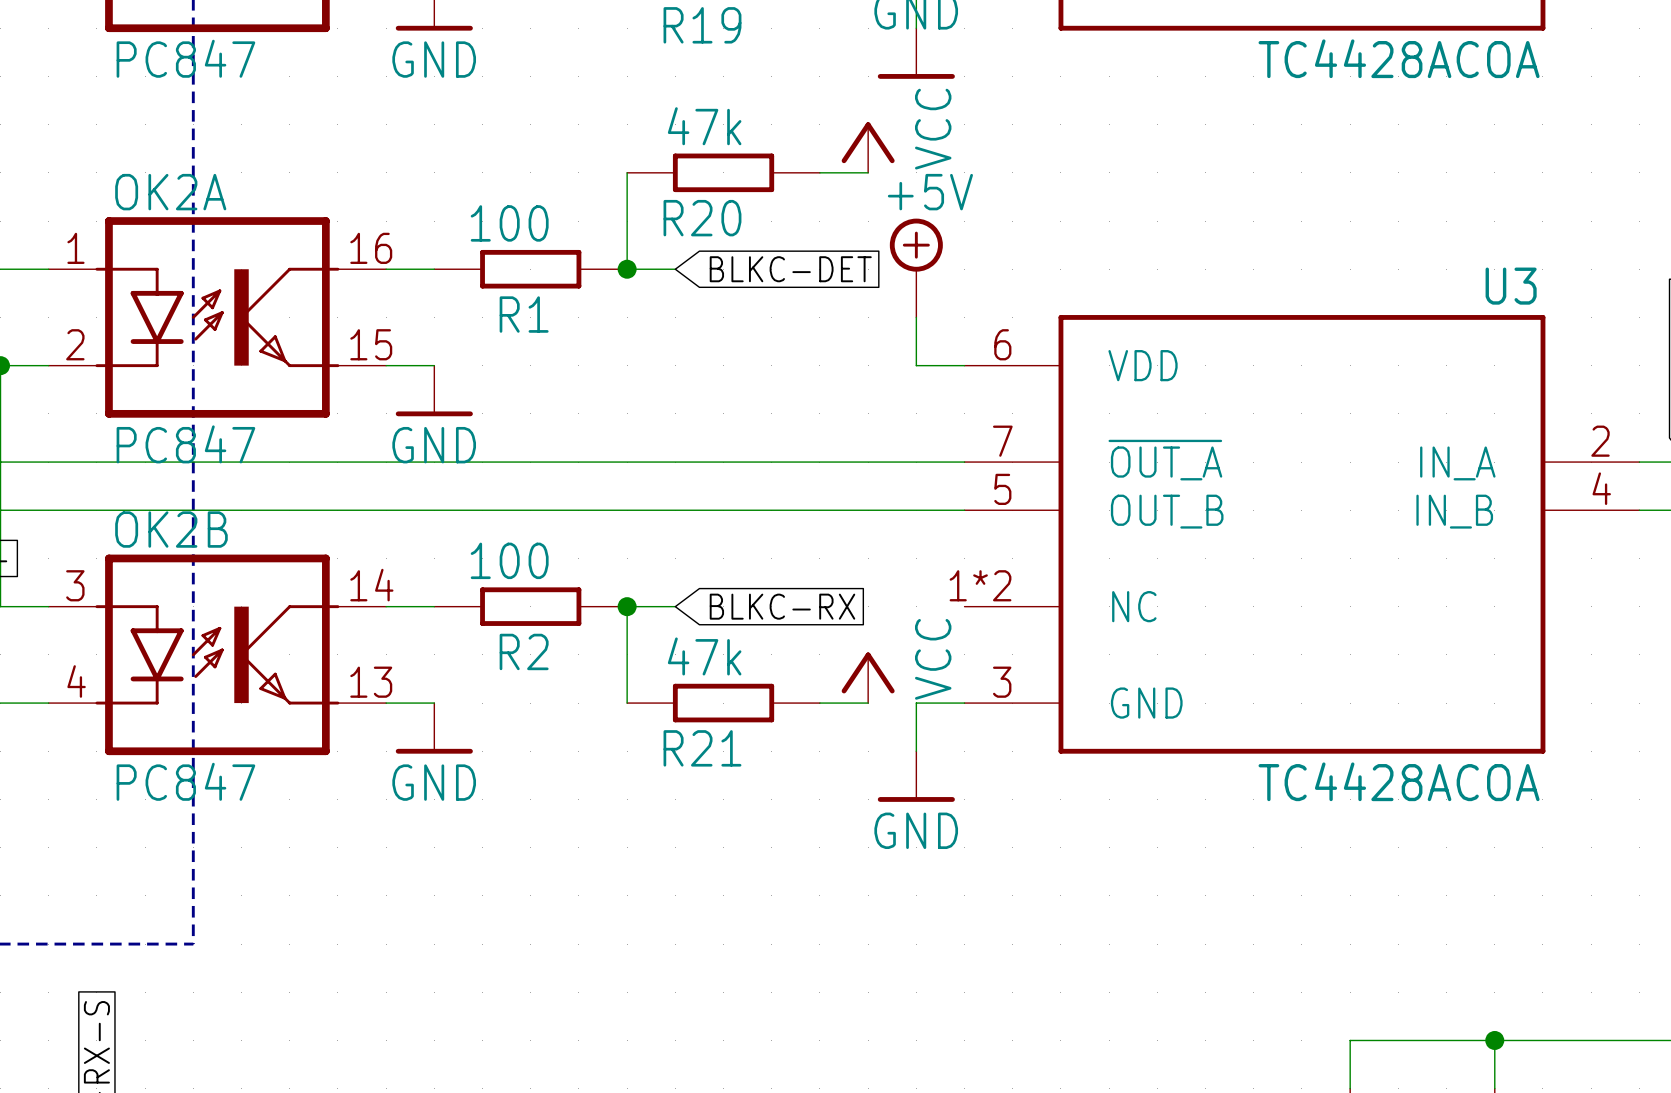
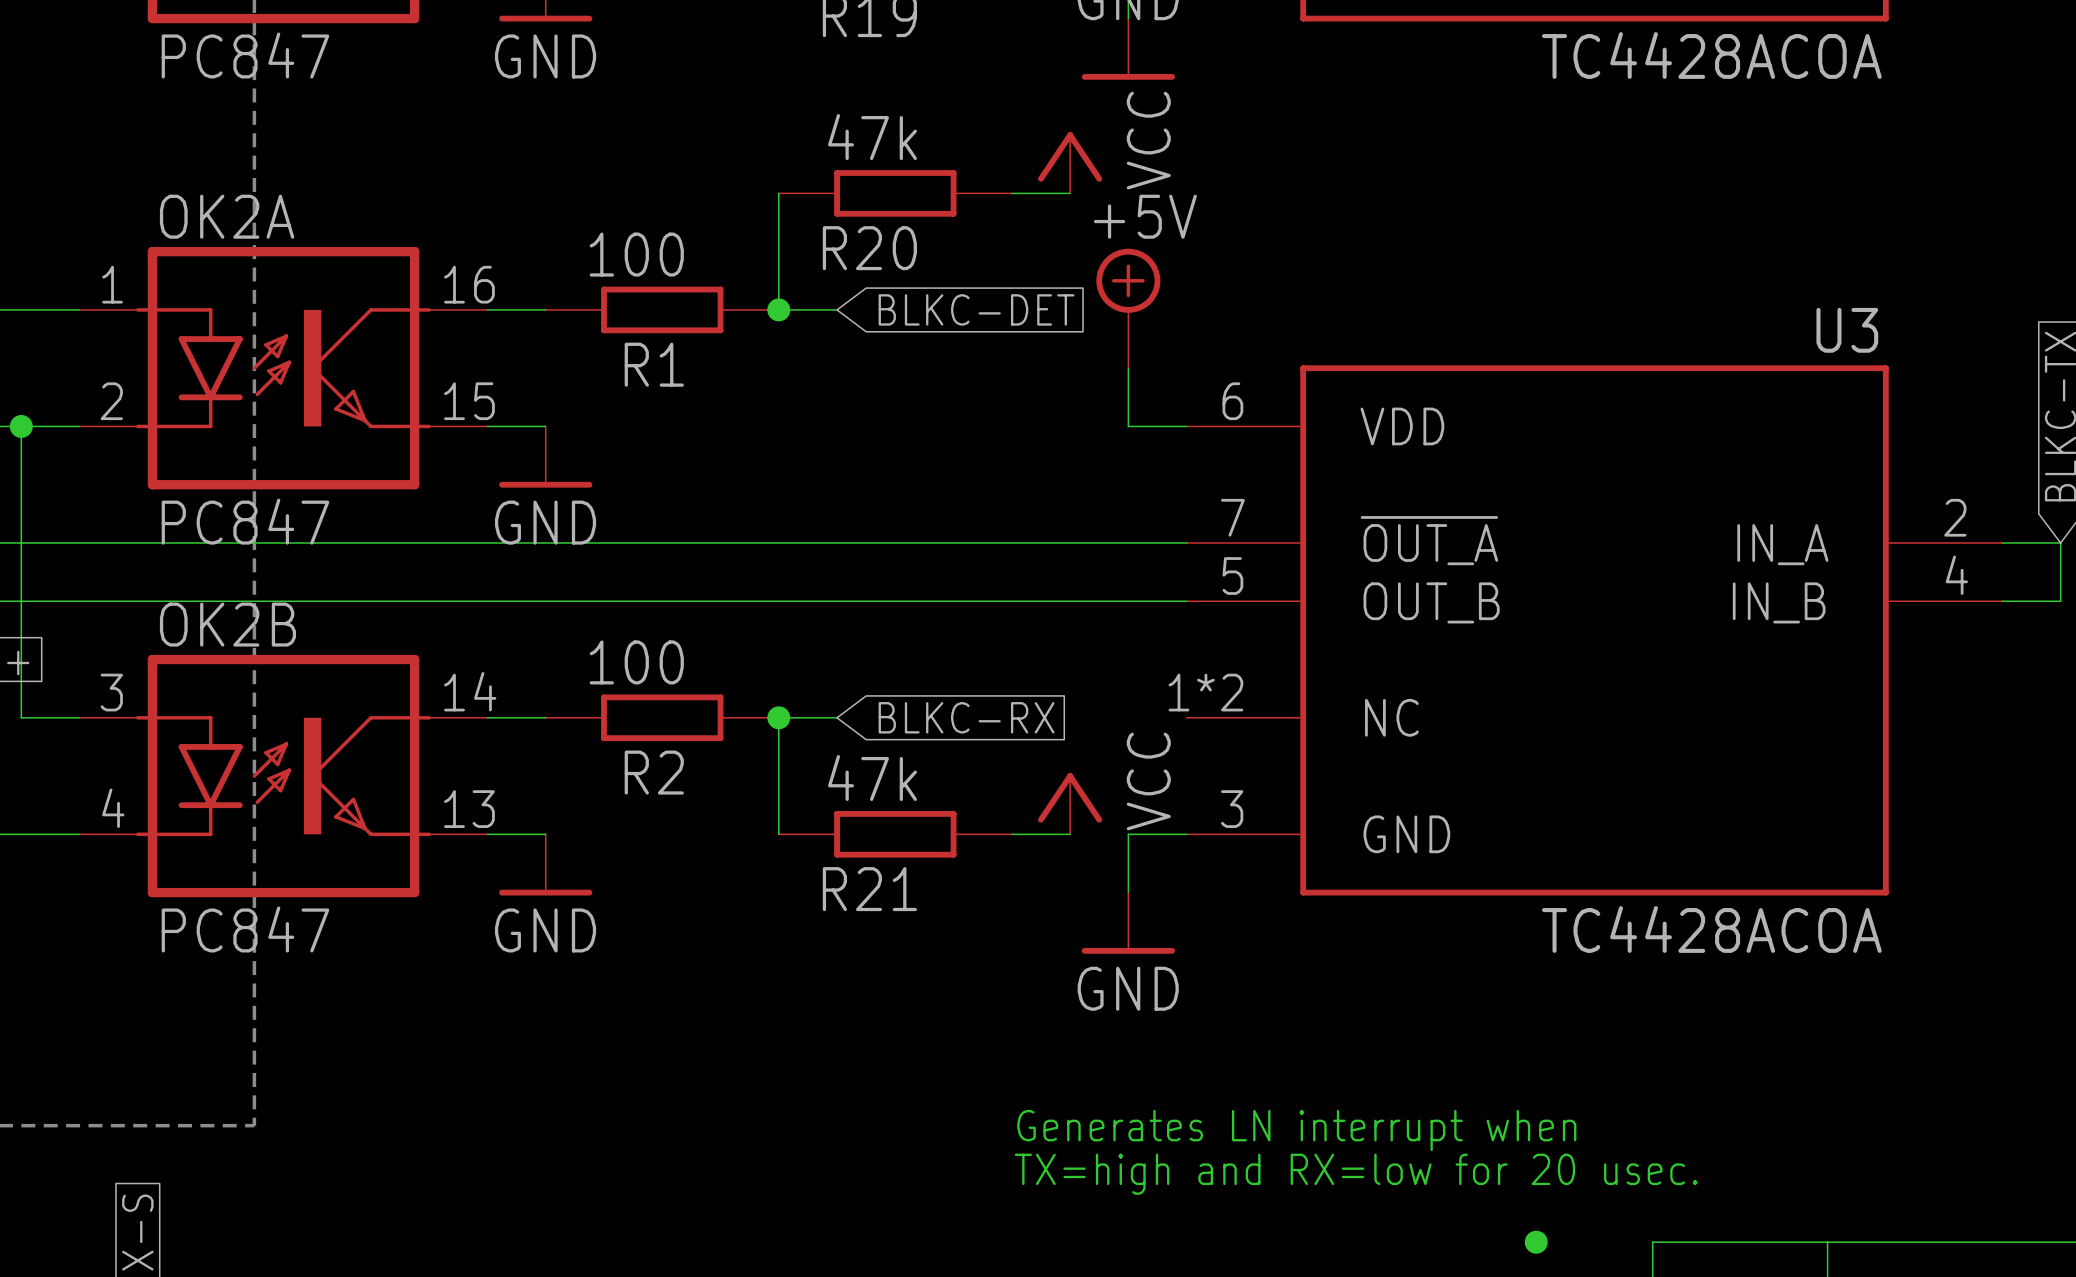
text: none -> Generates LN interrupt when (1296, 1130)
text: none -> TX=high and RX=low for 20 usec. (1356, 1174)
junction: none -> (1536, 1242)
junction: (1494, 1040) -> none

